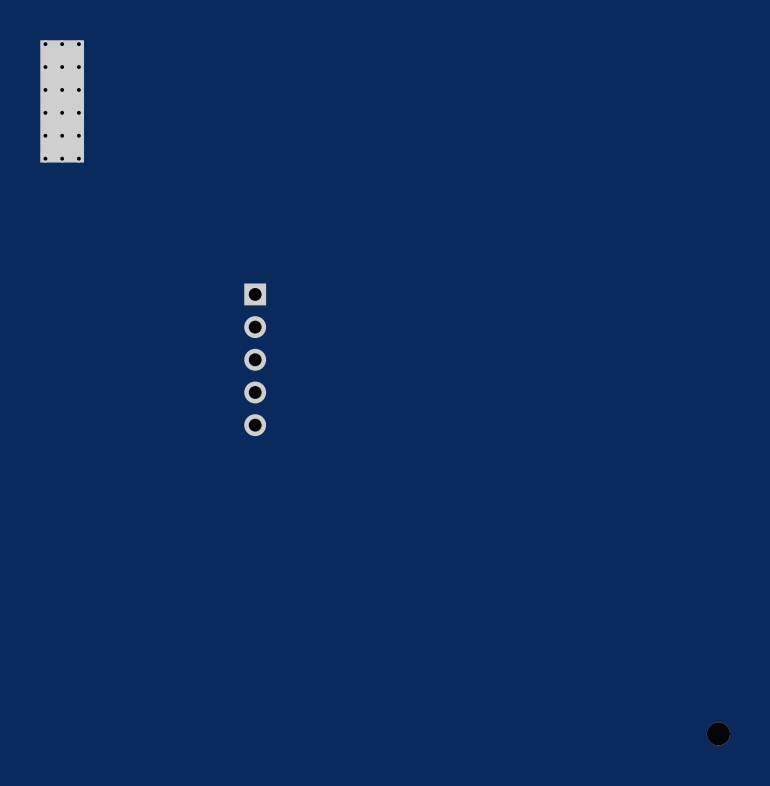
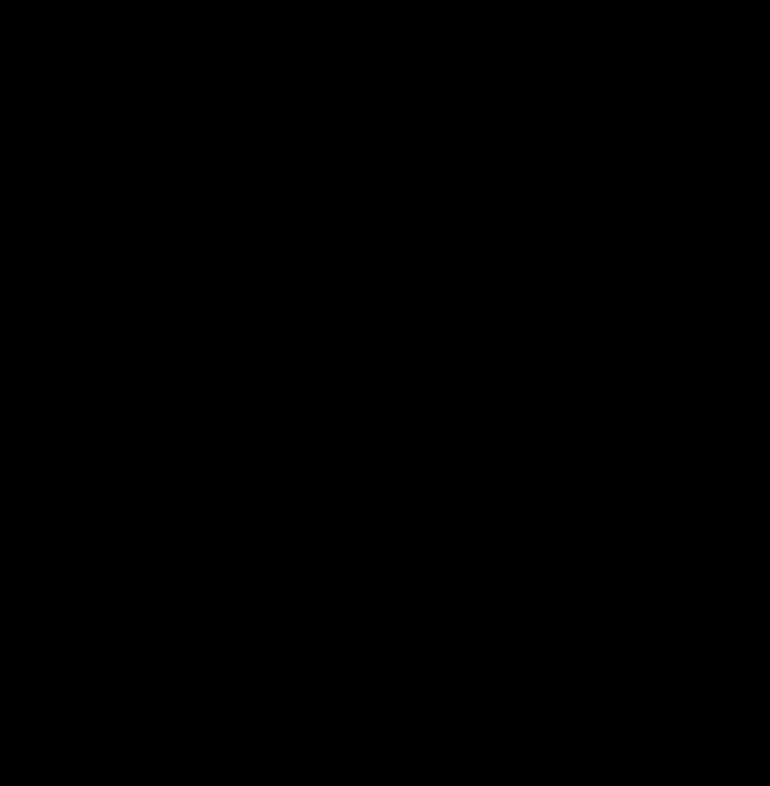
part: (62, 101) -> none
part: (255, 359) -> none
part: (718, 733) -> none

